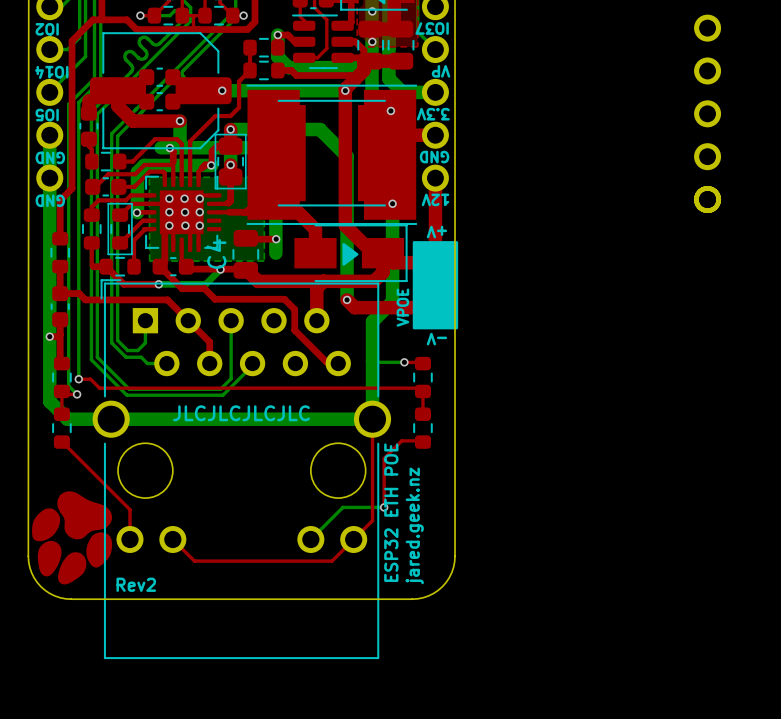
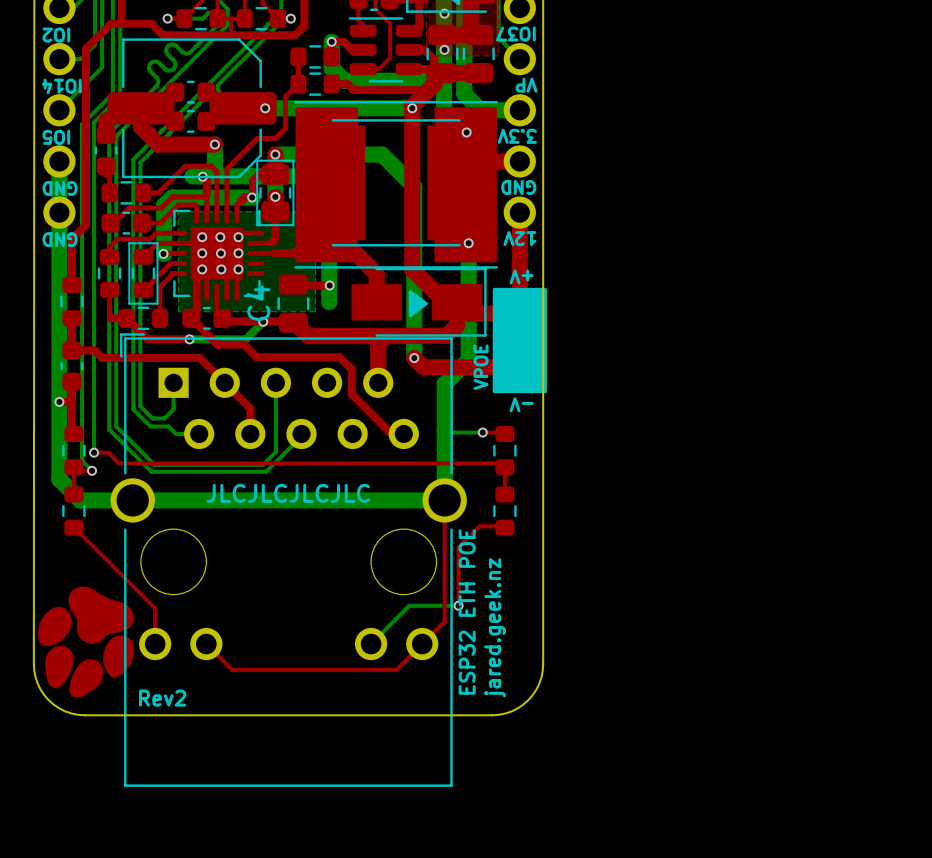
part: (707, 28) -> none
part: (707, 70) -> none
part: (707, 113) -> none
part: (707, 156) -> none
part: (707, 199) -> none

